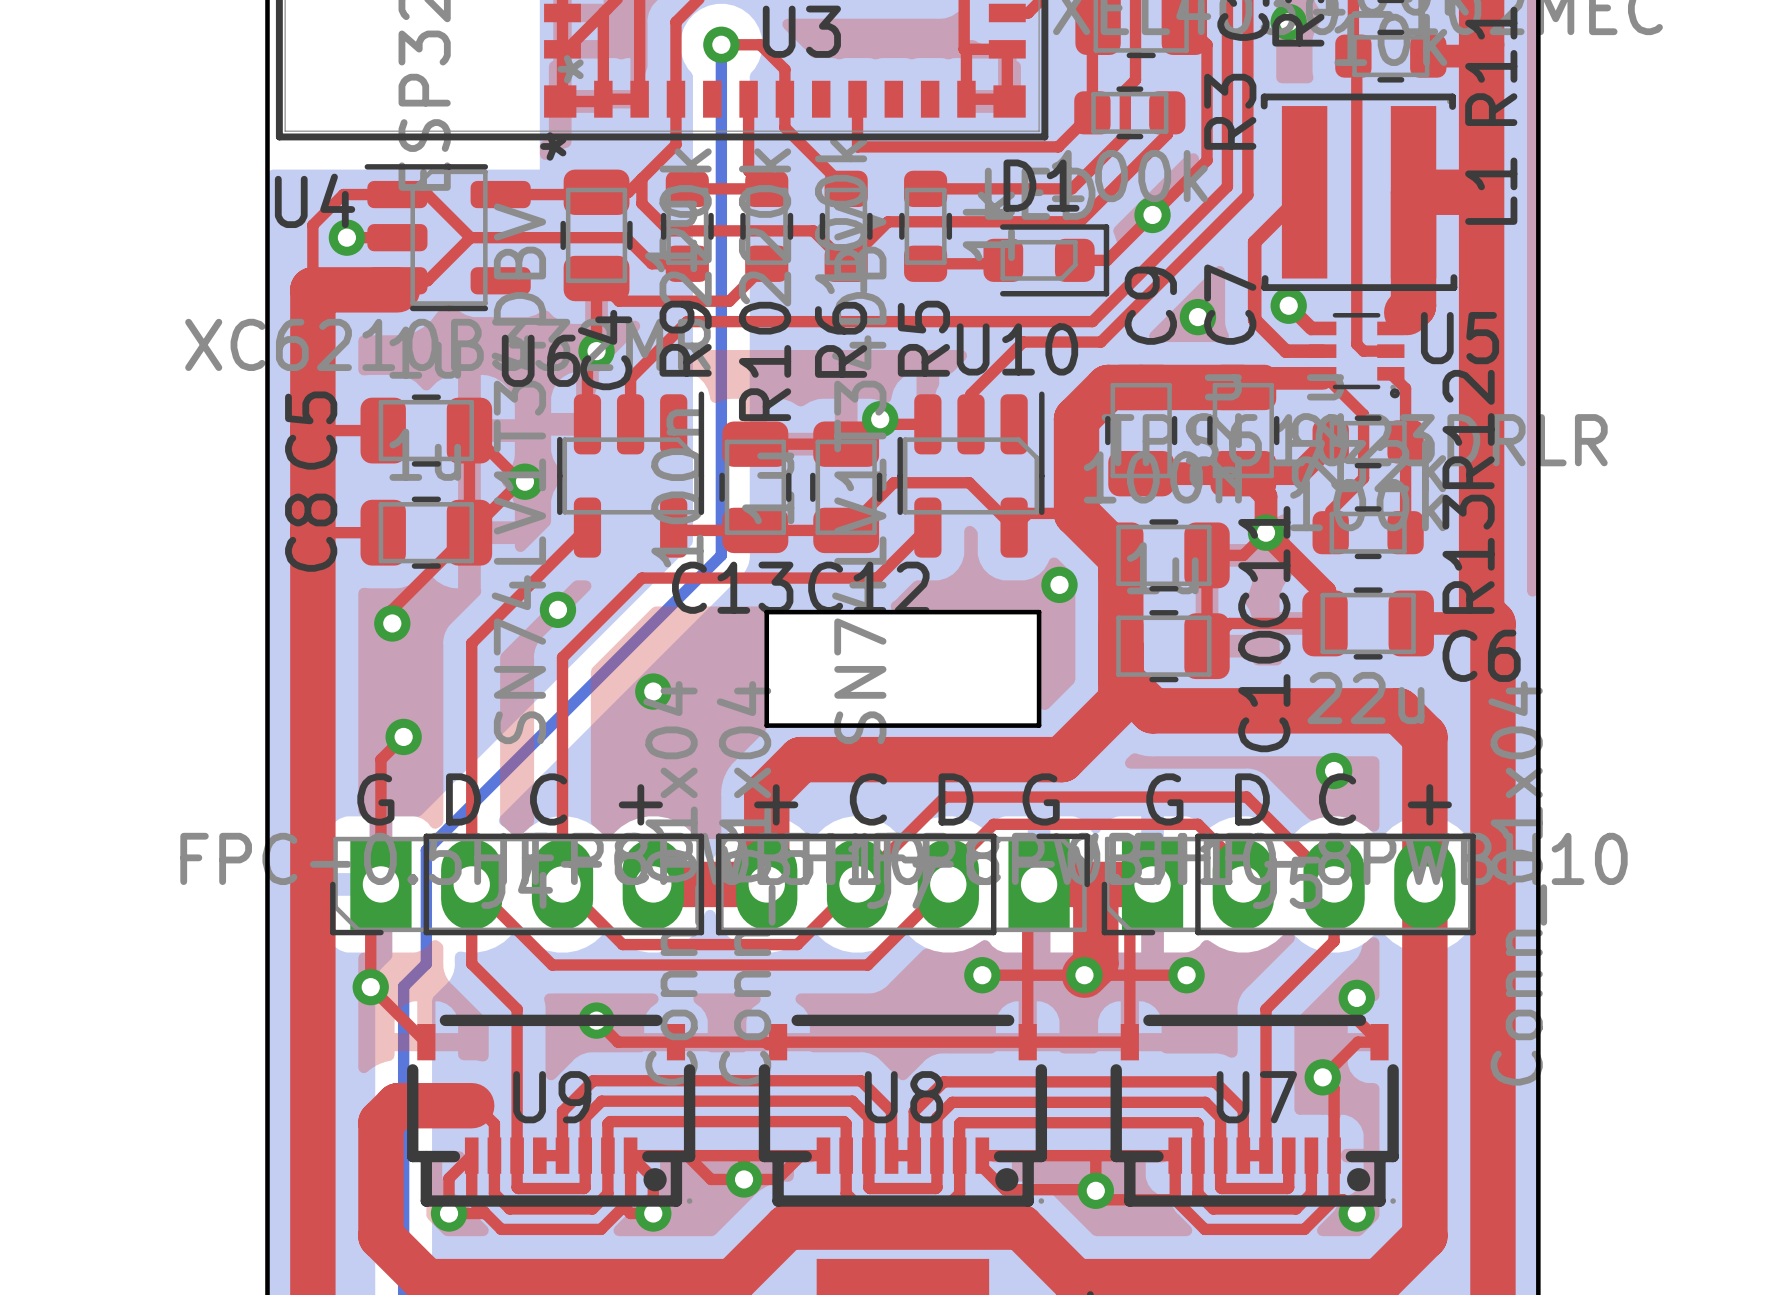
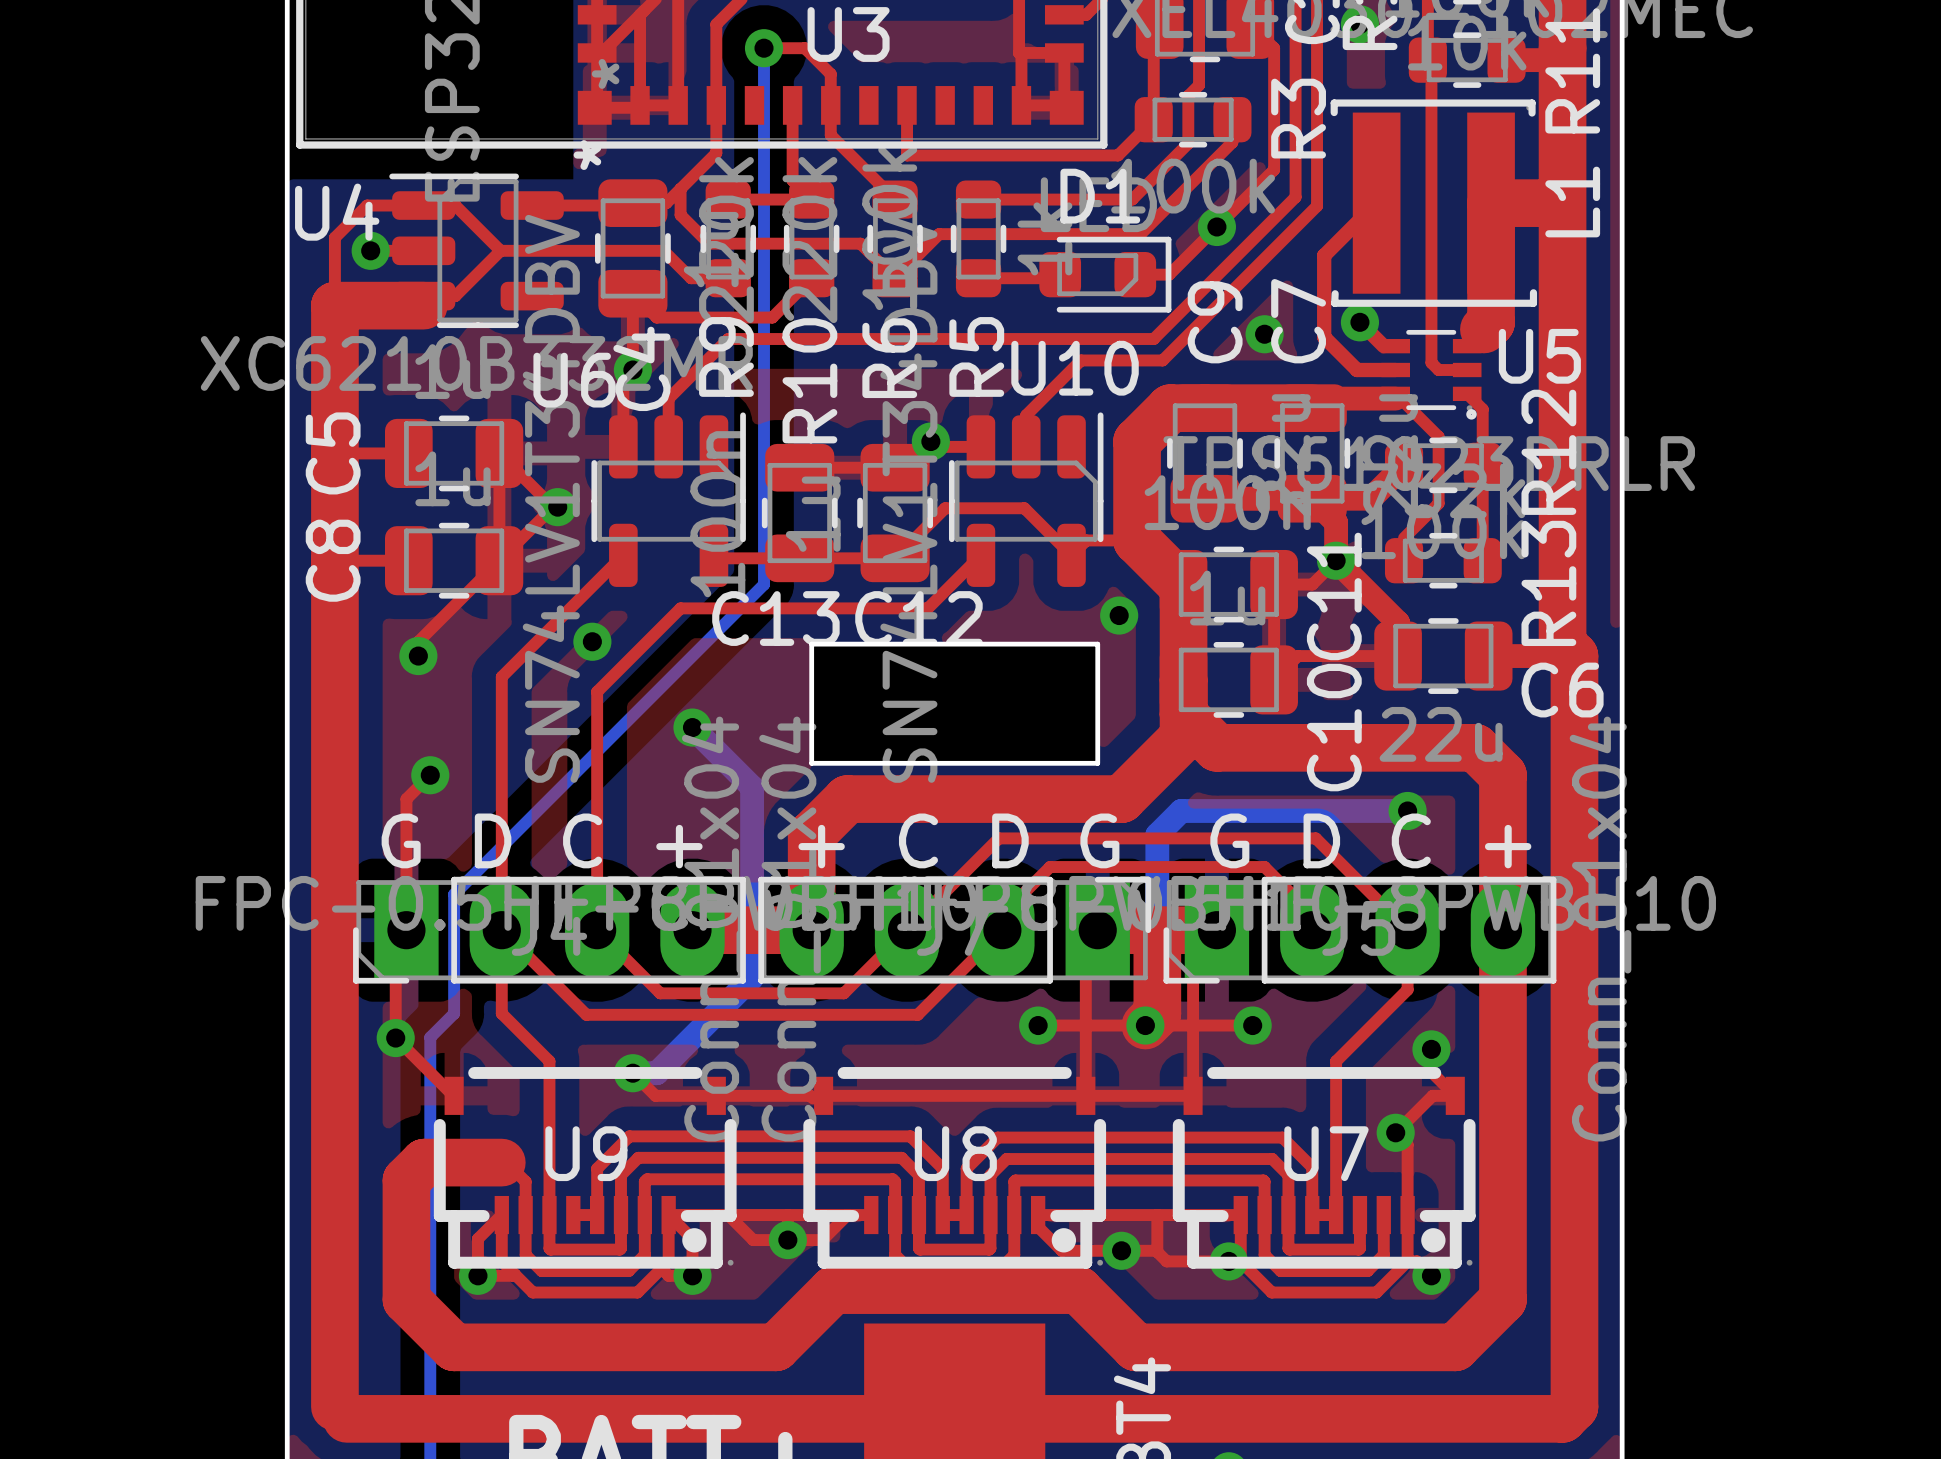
bottom track: none -> (692, 727) (752, 787) (752, 977) (656, 1073) (632, 1073)
bottom track: none -> (1407, 811) (1181, 811) (1157, 834) (1157, 1013) (1145, 1025)
via position: (1095, 1190) -> (1121, 1250)
via: none -> (1228, 1261)

